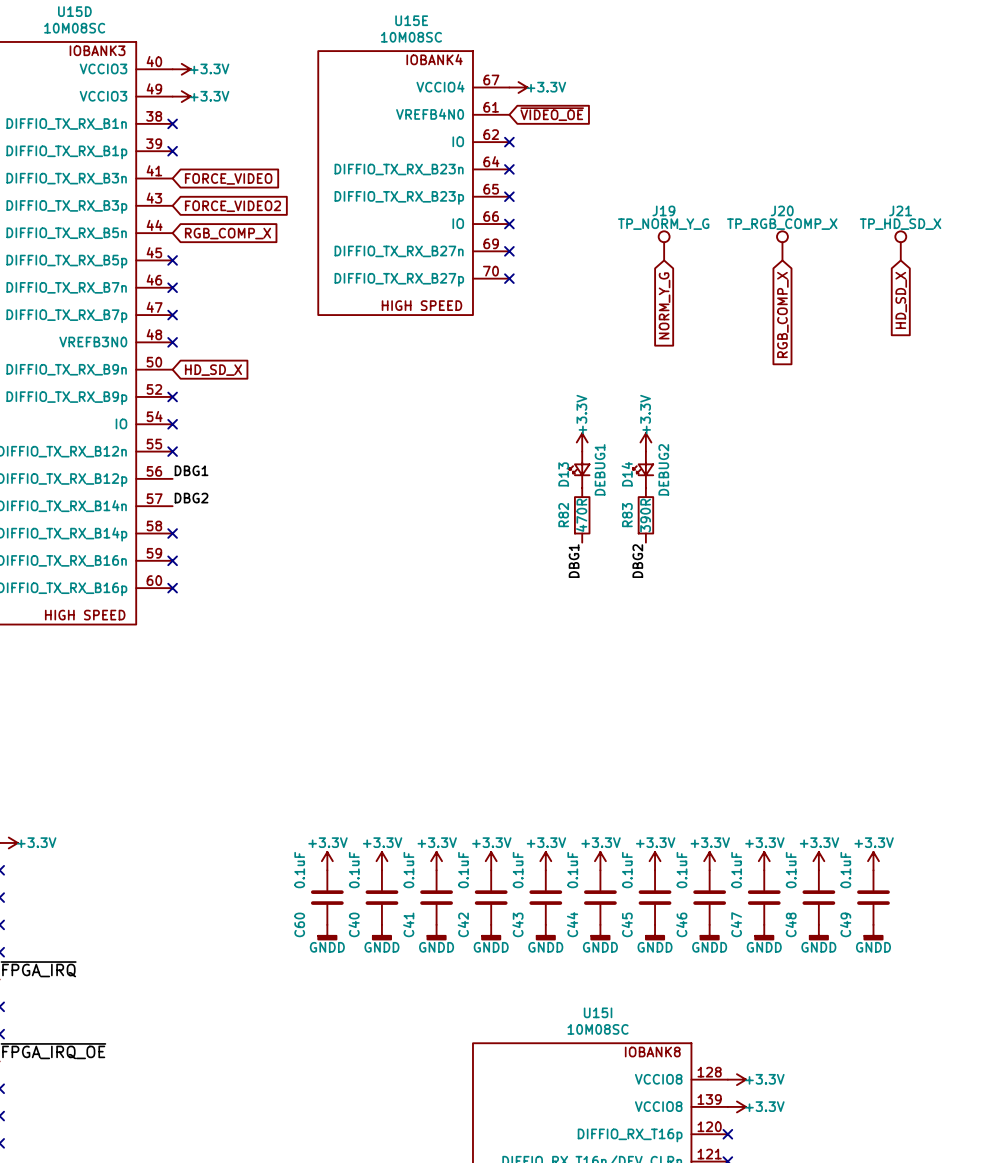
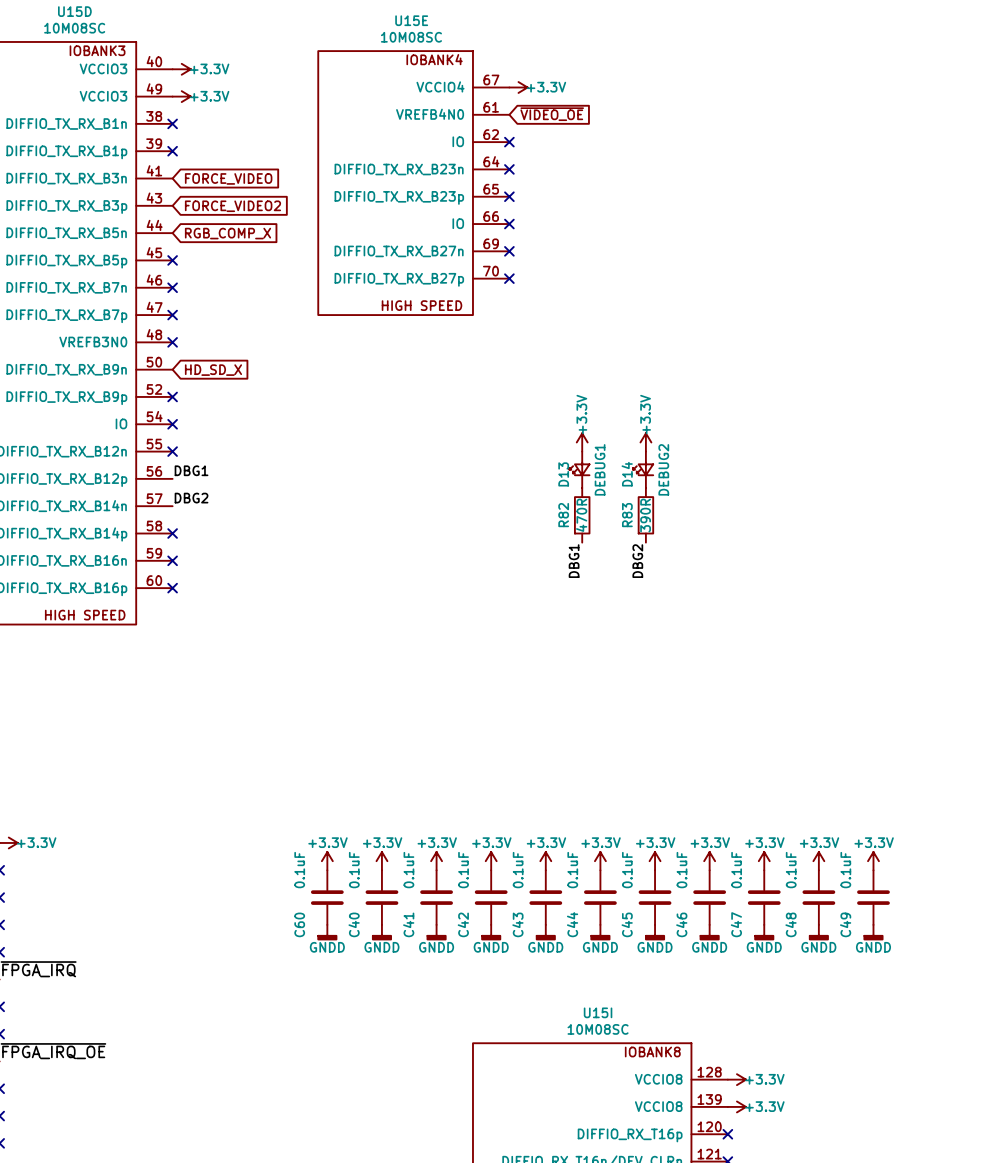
J19: TP_NORM_Y_G (664, 245) -> none
J20: TP_RGB_COMP_X (782, 245) -> none
J21: TP_HD_SD_X (900, 245) -> none
global label: HD_SD_X (901, 300) -> none
global label: NORM_Y_G (664, 305) -> none
global label: RGB_COMP_X (782, 314) -> none

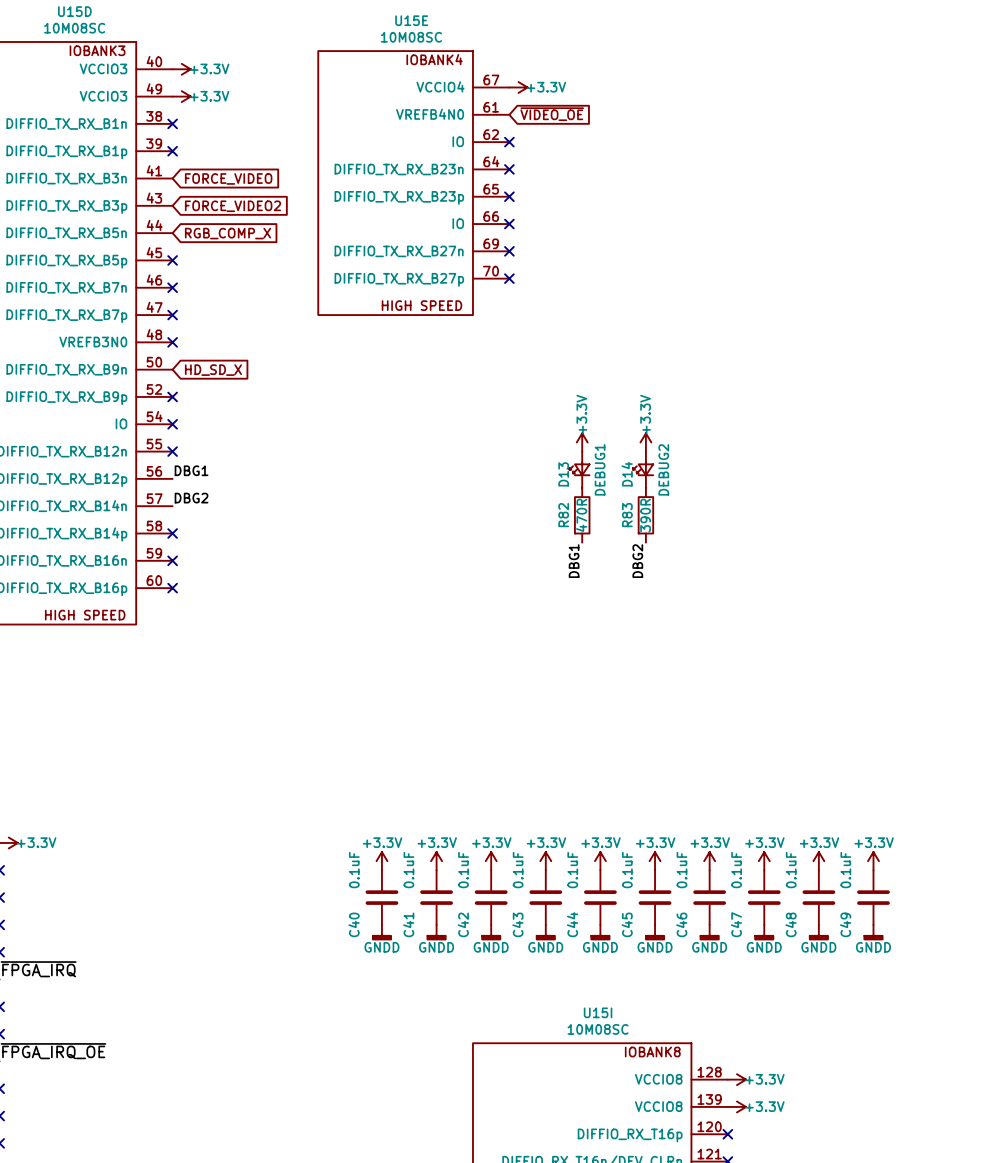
power symbol: +3.3V (327, 861) -> none
C60: 0.1uF (327, 897) -> none
power symbol: GNDD (327, 932) -> none

